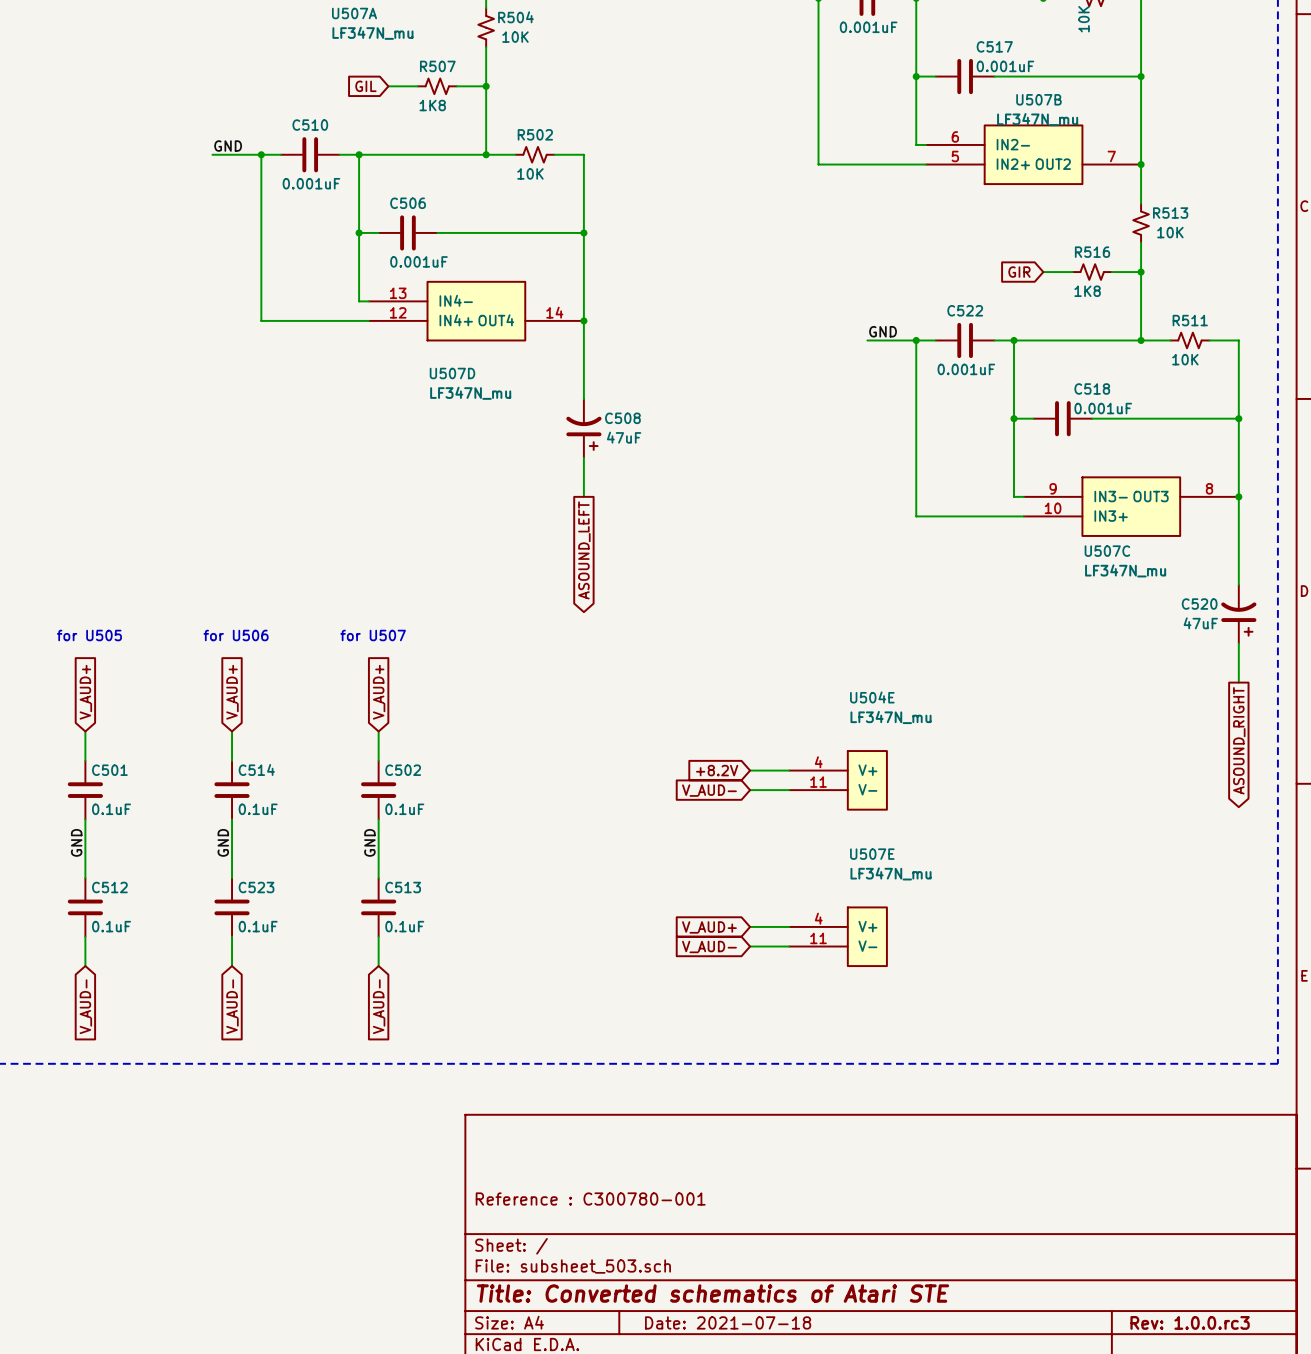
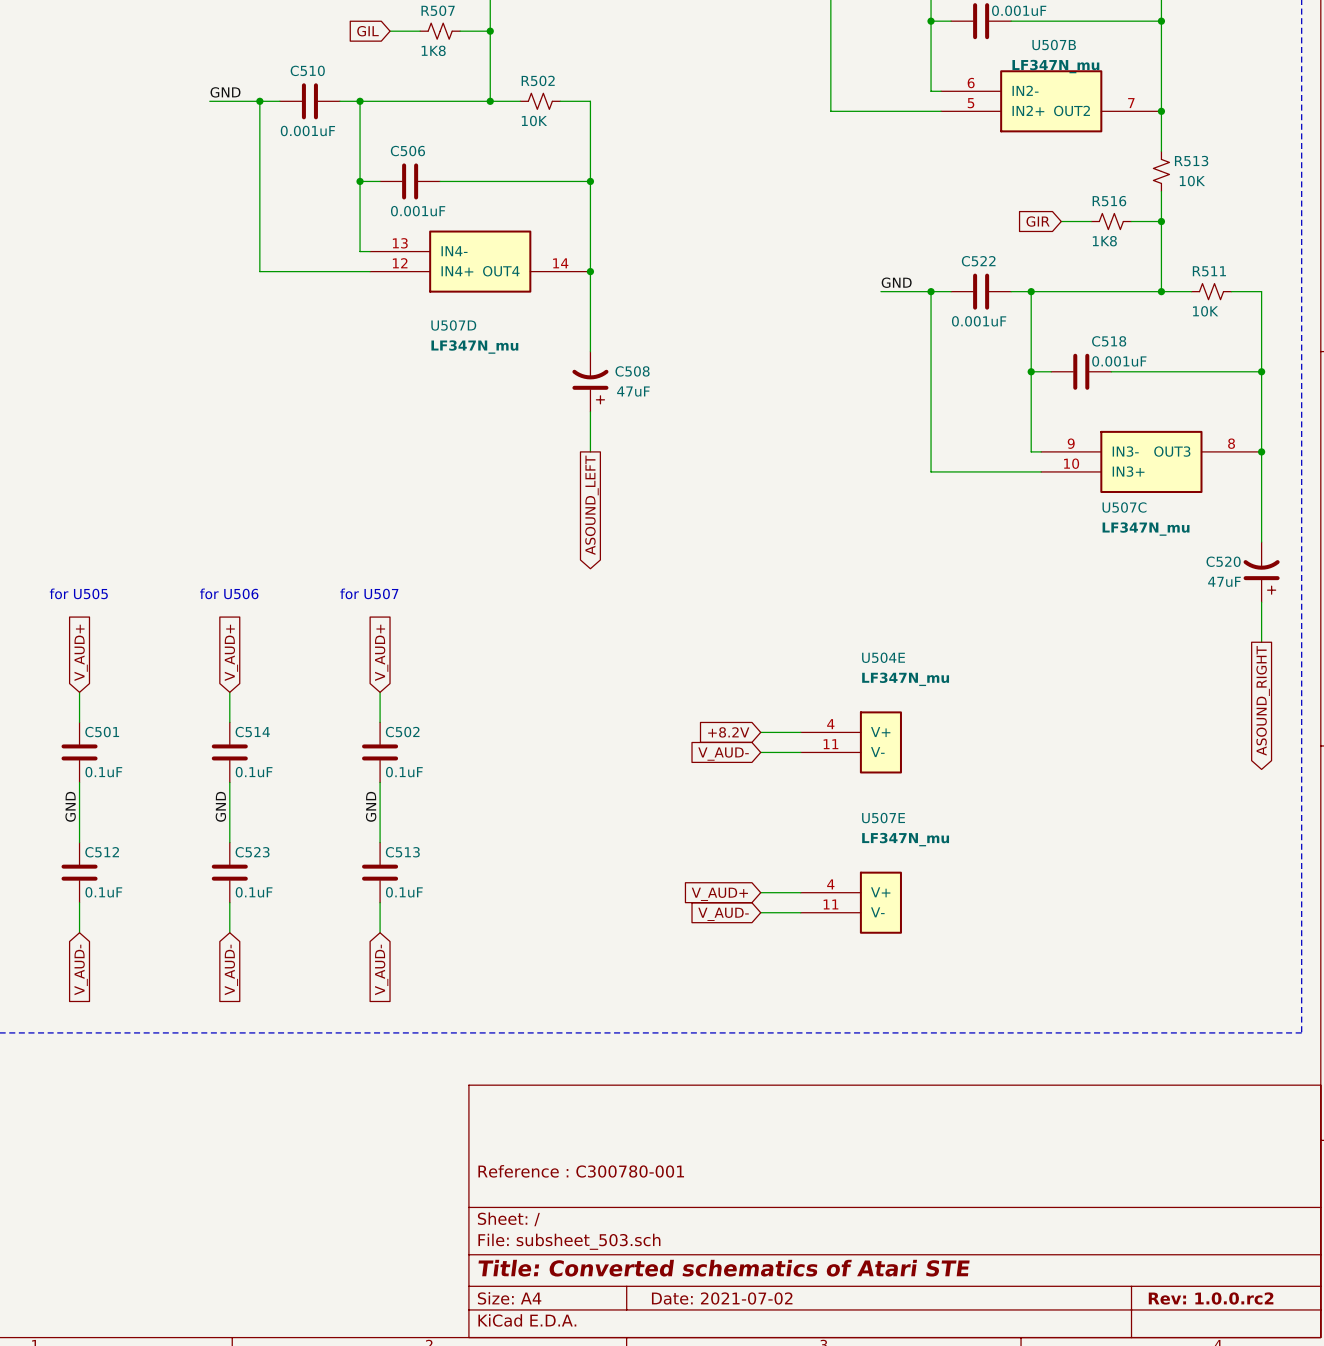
title block: Date: 2021-07-18 (728, 1322) -> Date: 2021-07-02 (722, 1298)
title block: Rev: 1.0.0.rc3 (1190, 1322) -> Rev: 1.0.0.rc2 (1211, 1298)

